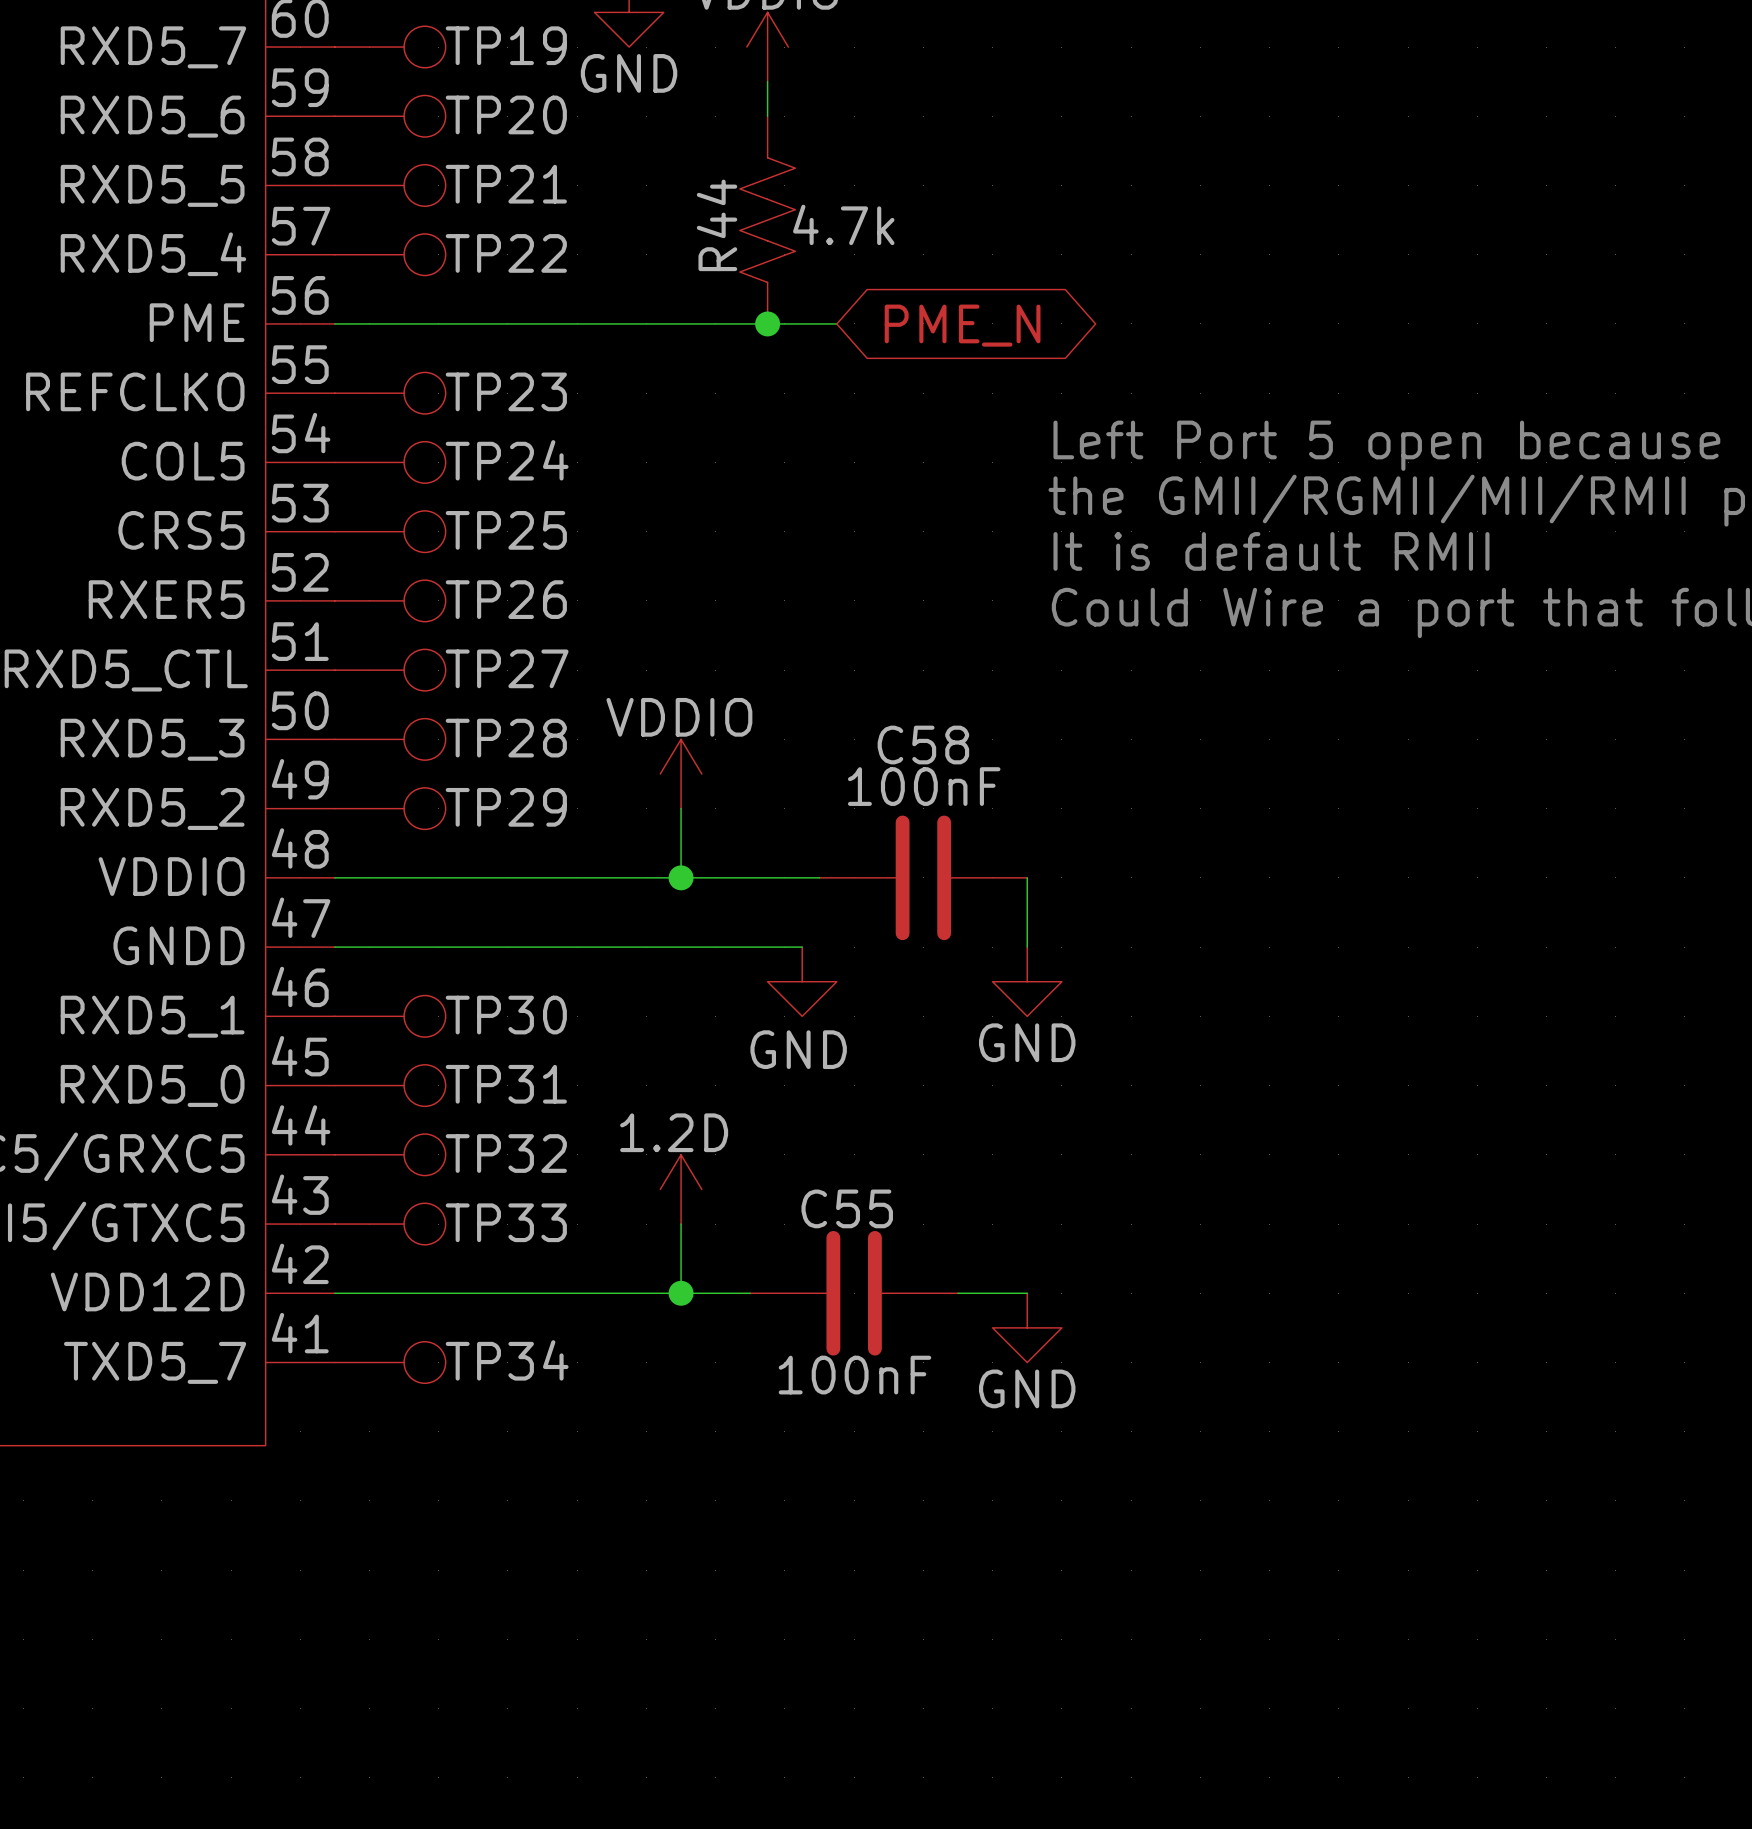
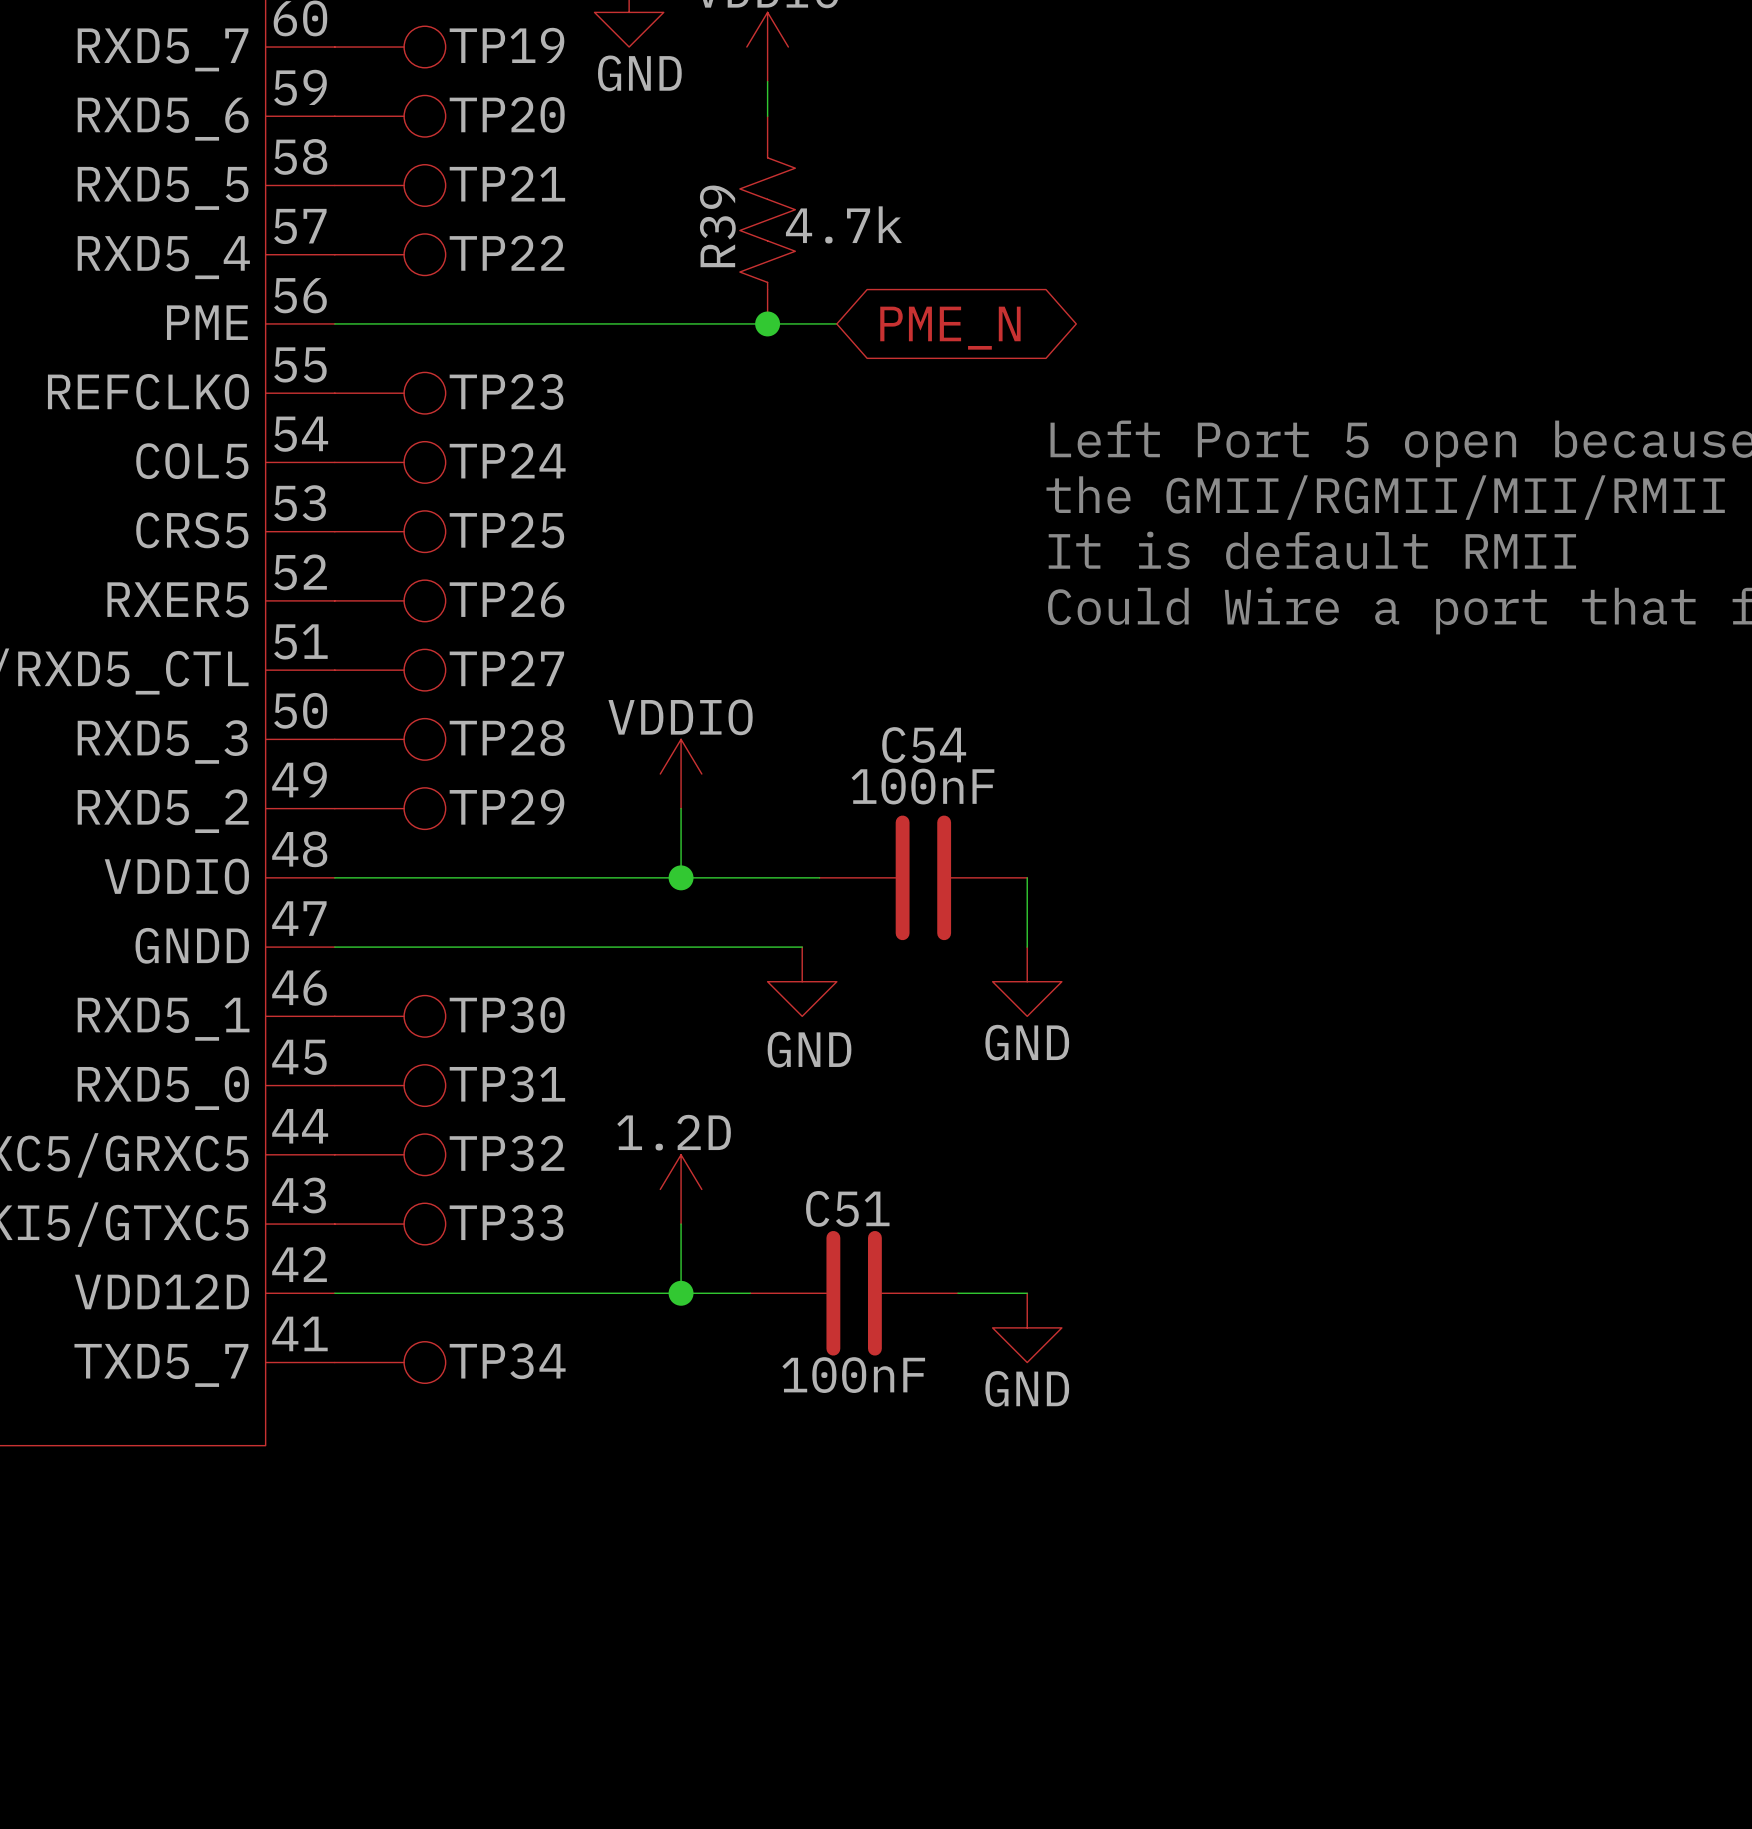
R44 name: R44 (717, 225) -> R39 (717, 226)
C58 name: C58 (923, 745) -> C54 (924, 745)
C55 name: C55 (847, 1208) -> C51 (847, 1208)

